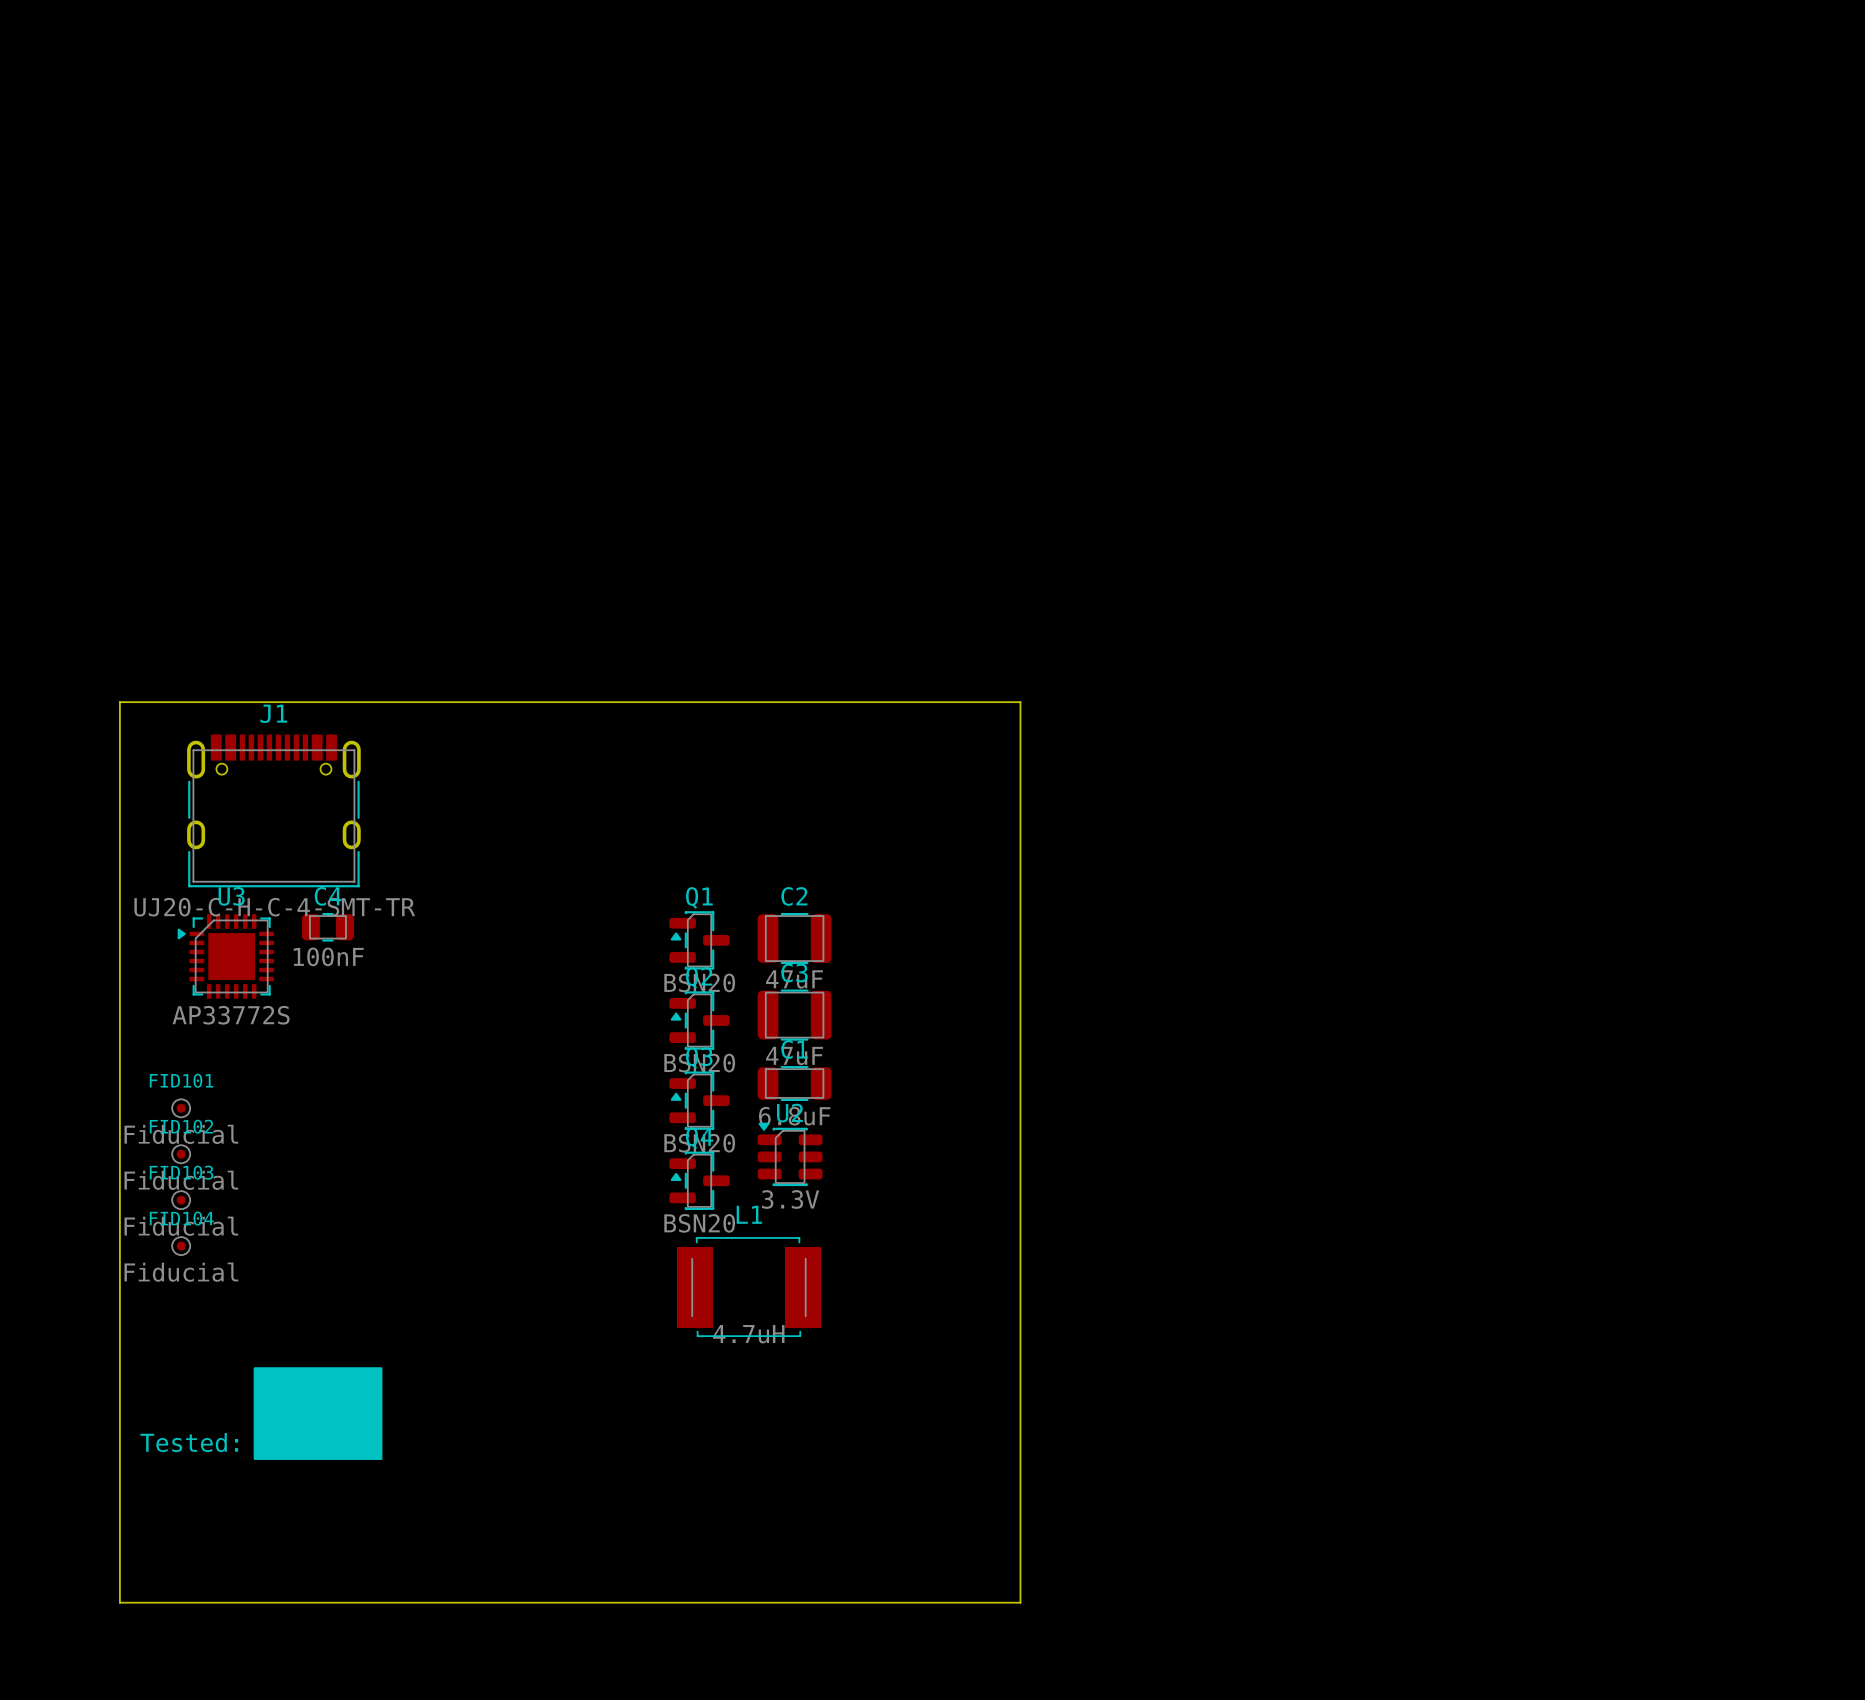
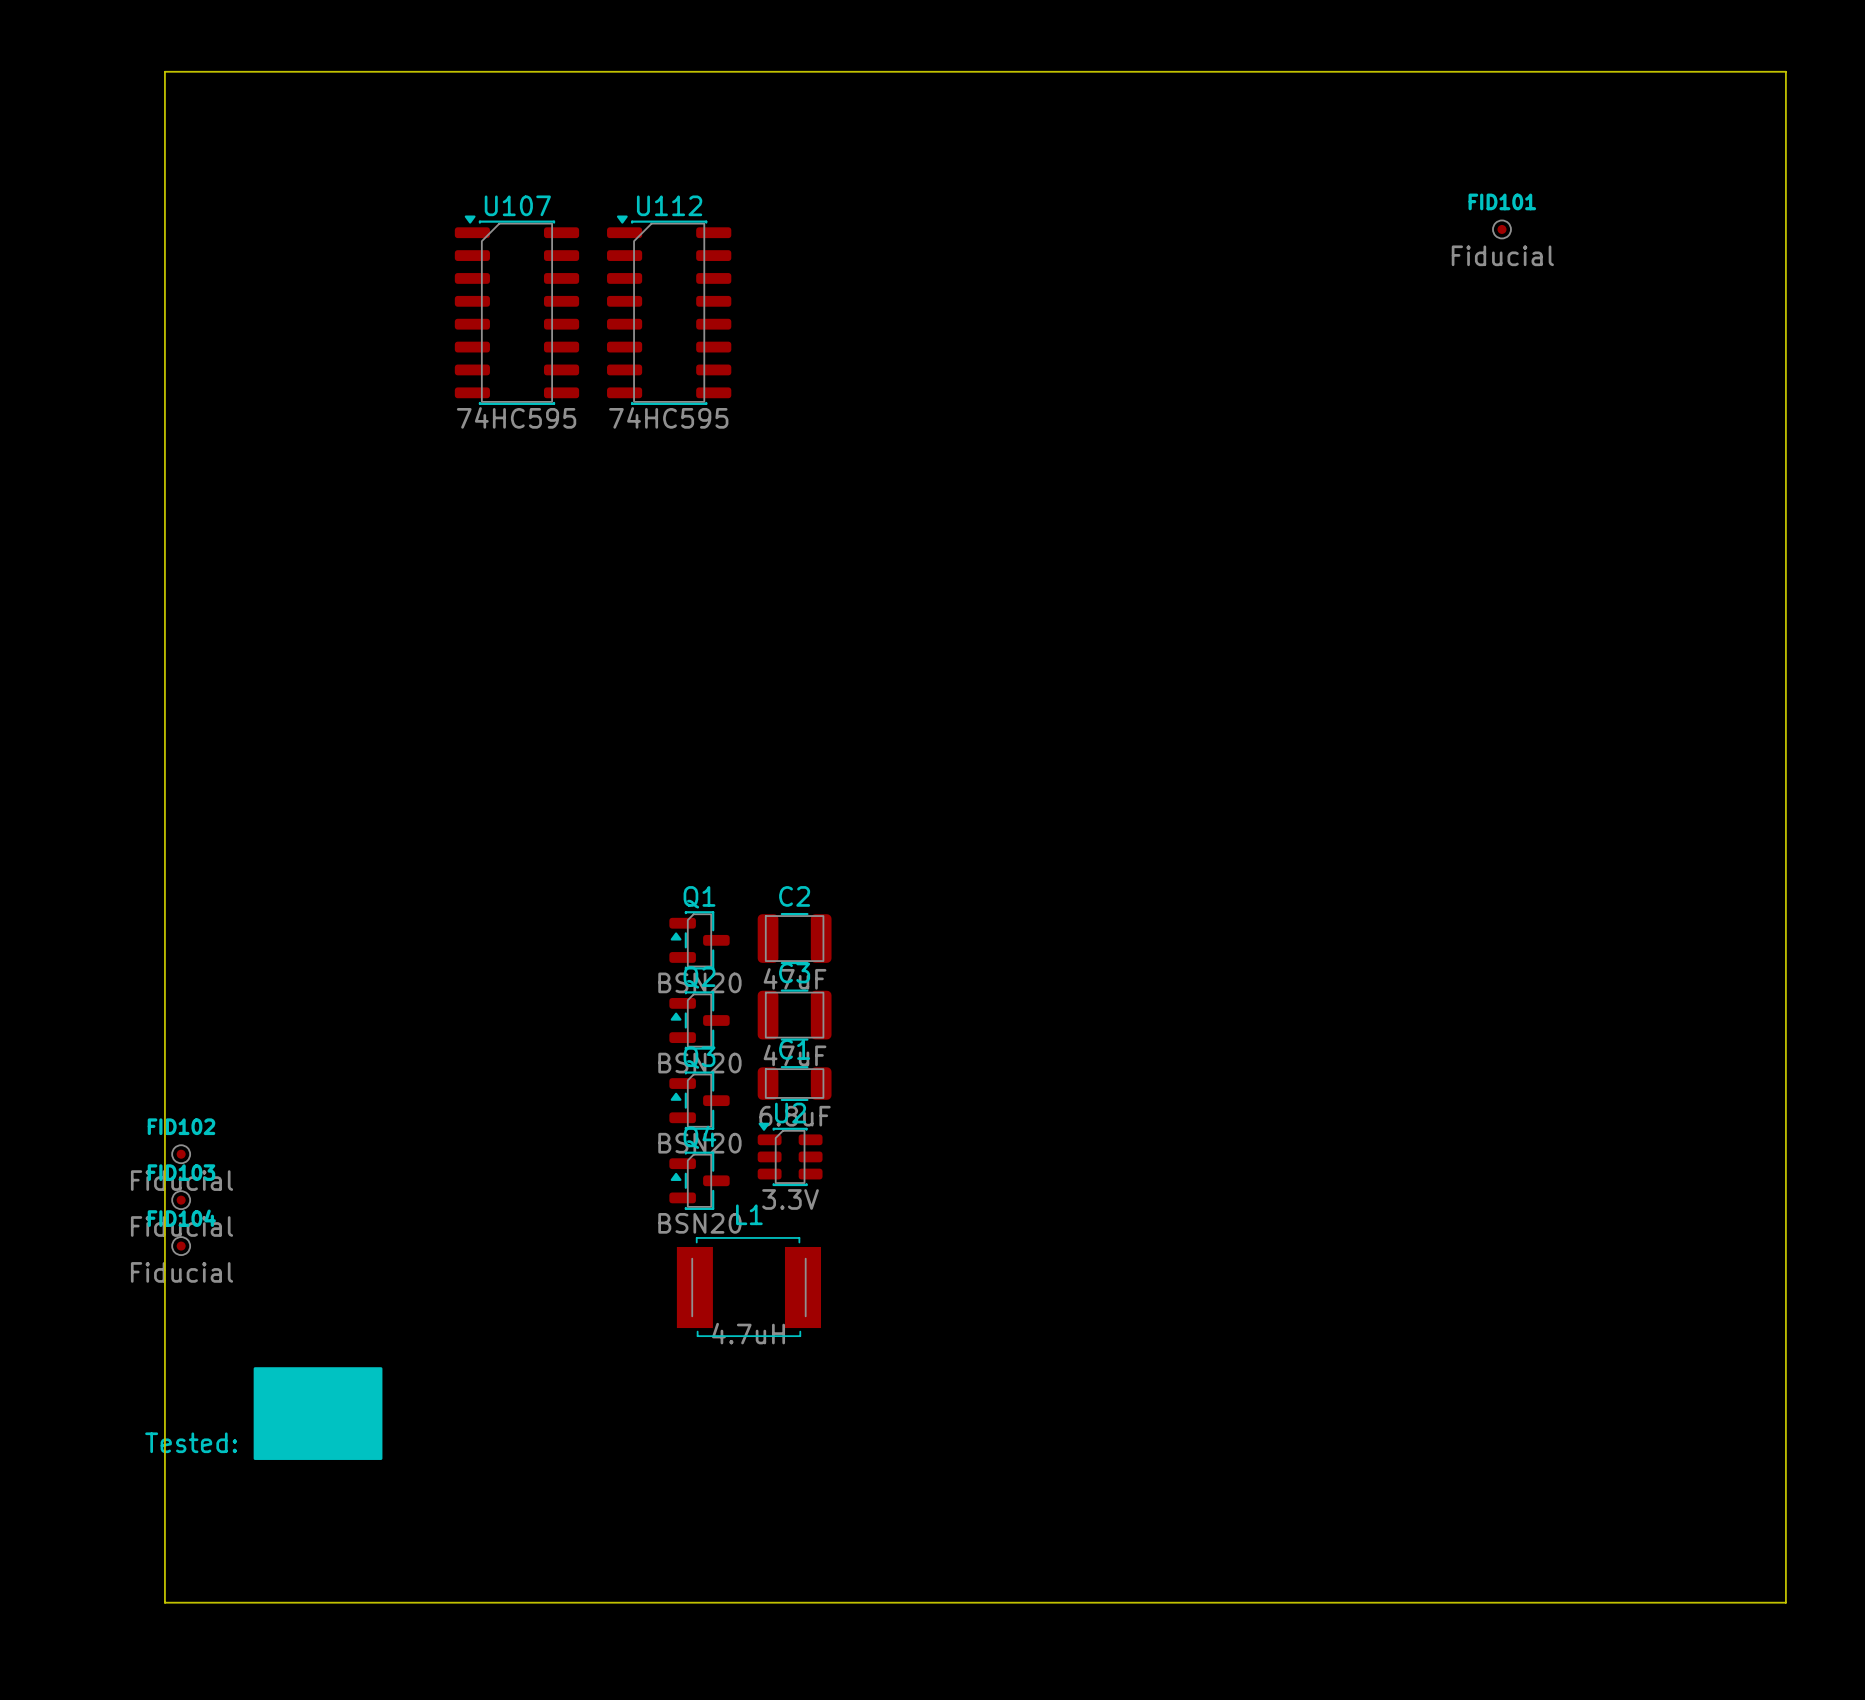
U107: none -> 74HC595 (516, 310)
U112: none -> 74HC595 (669, 310)
J1: UJ20-C-H-C-4-SMT-TR (273, 810) -> none
C4: 100nF (327, 927) -> none
U3: AP33772S (225, 956) -> none
FID101 position: (181, 1108) -> (1501, 229)
board edge: (164, 1602) (119, 1602) (119, 702) (1020, 702) (1020, 1602) -> (164, 1602) (164, 71) (1785, 71) (1785, 1602) (1020, 1602)

